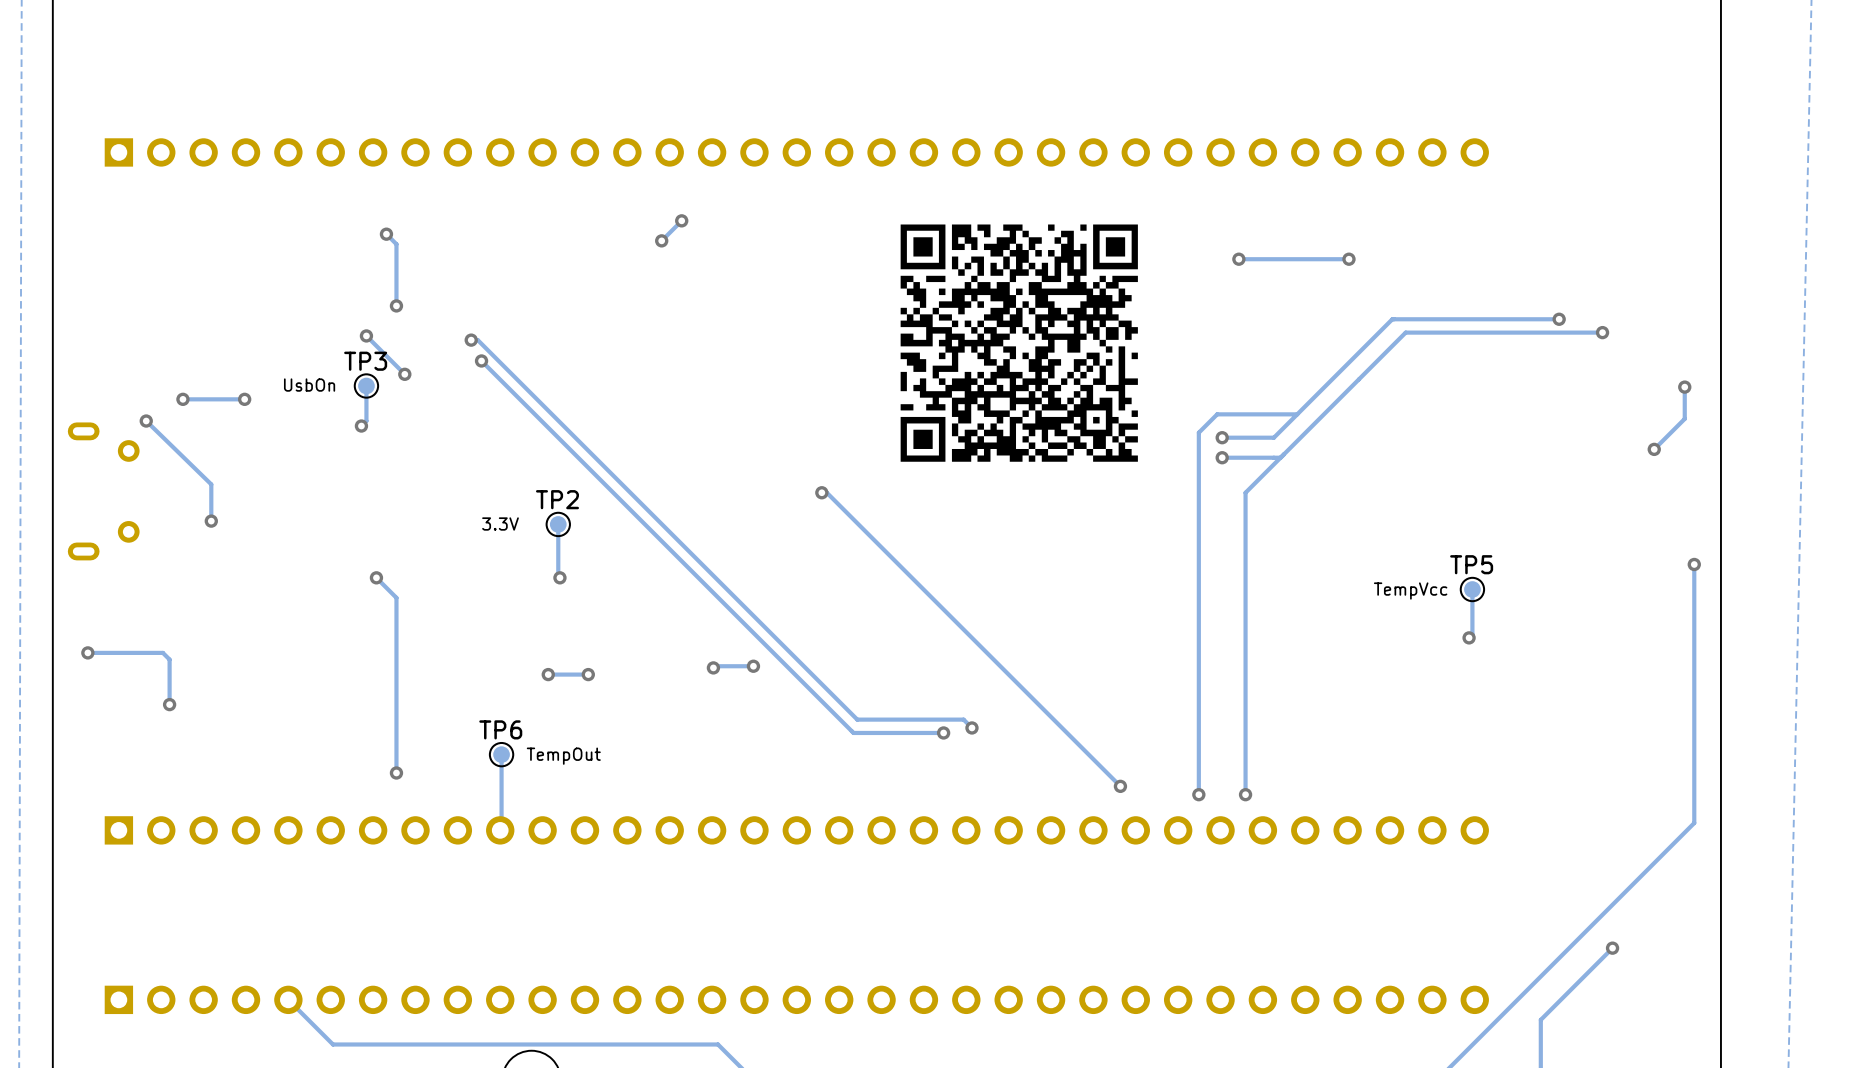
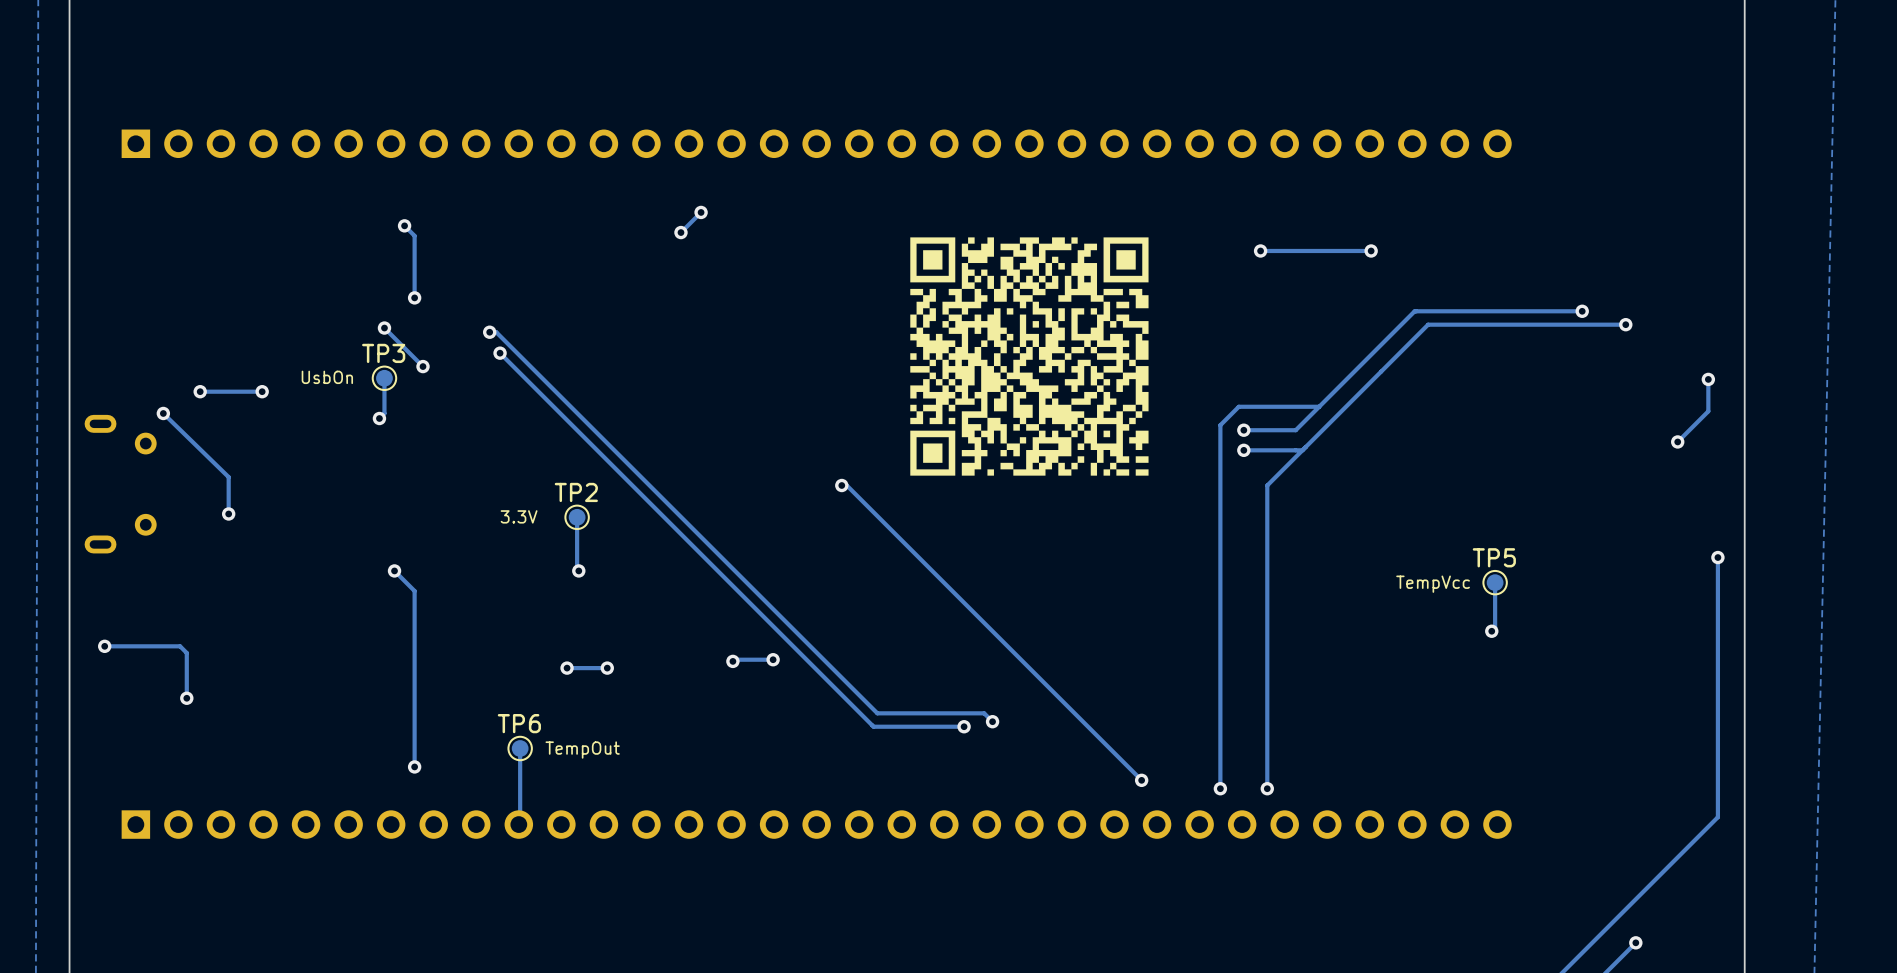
drawing: [900, 224, 1138, 462] -> none
drawing: none -> [910, 237, 1149, 476]

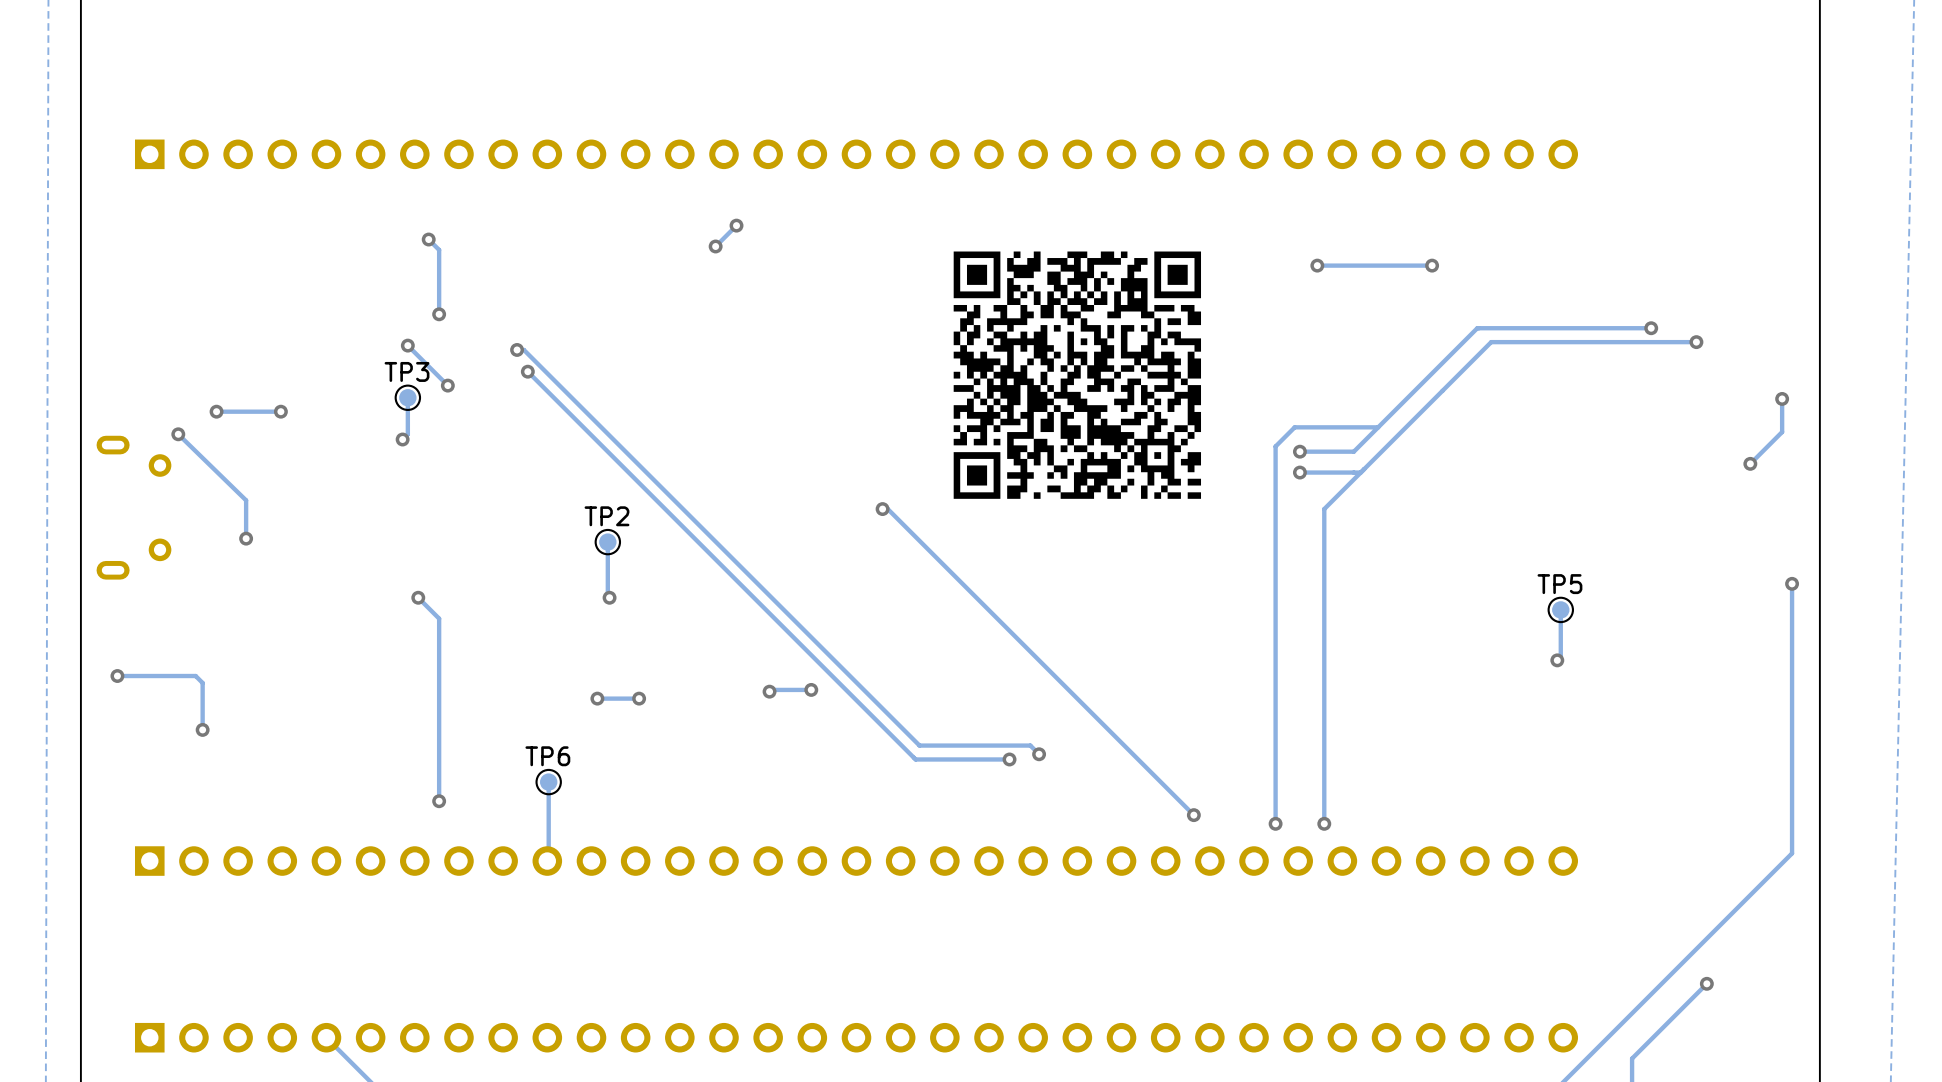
text: UsbOn (327, 377) -> none
text: 3.3V (519, 516) -> none
text: TempVcc (1433, 584) -> none
text: TempOut (582, 750) -> none

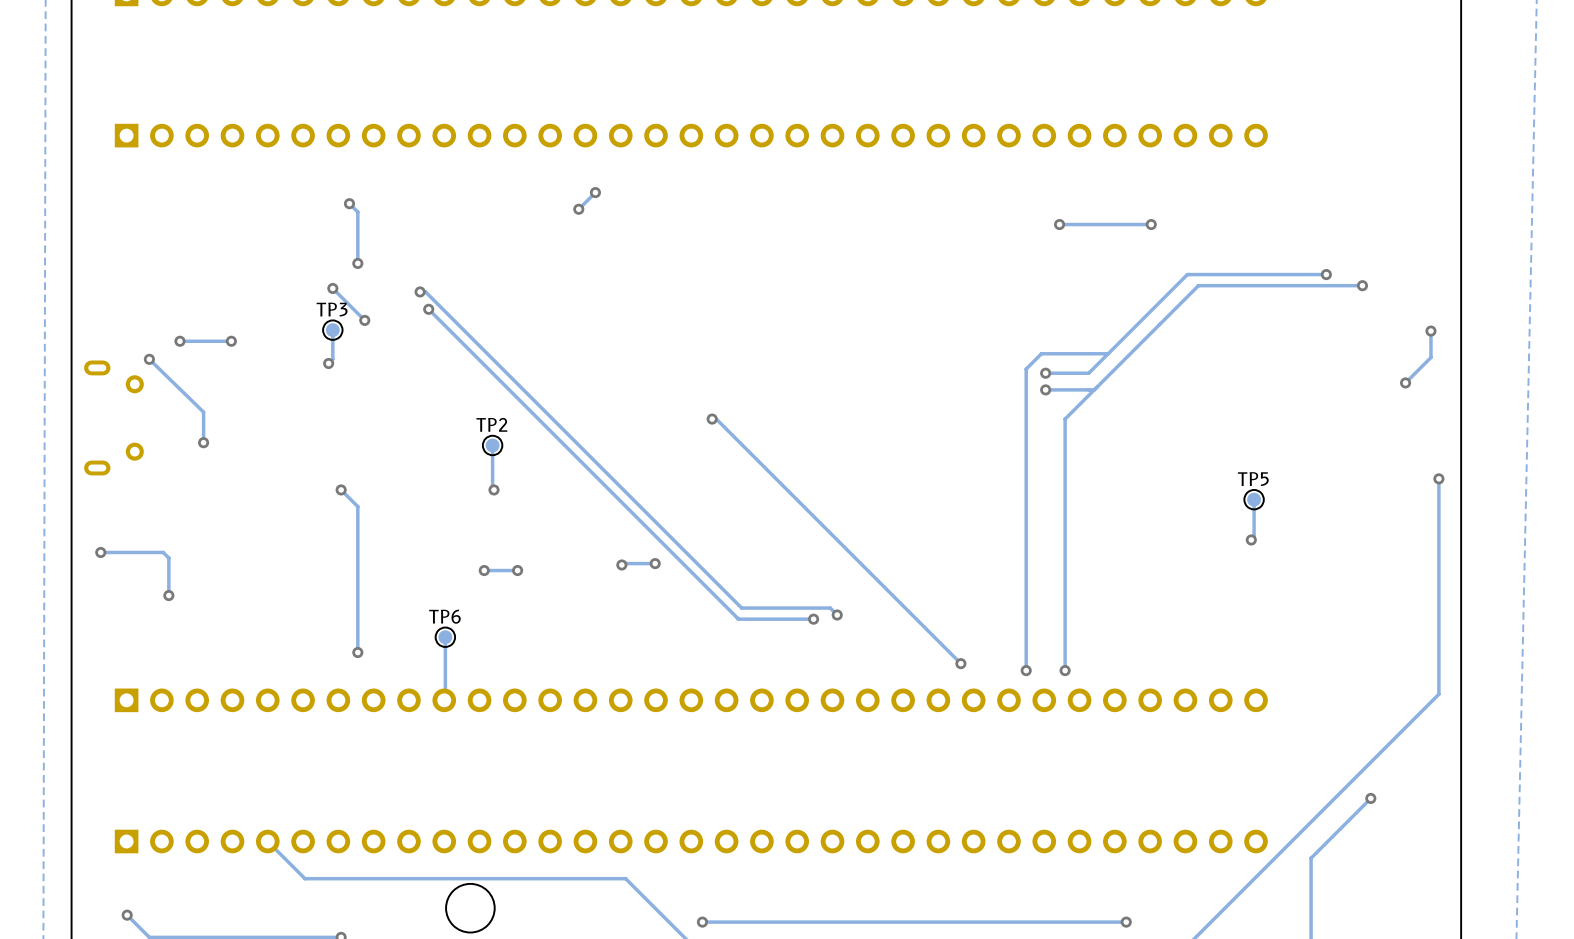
drawing: [953, 251, 1202, 499] -> none

